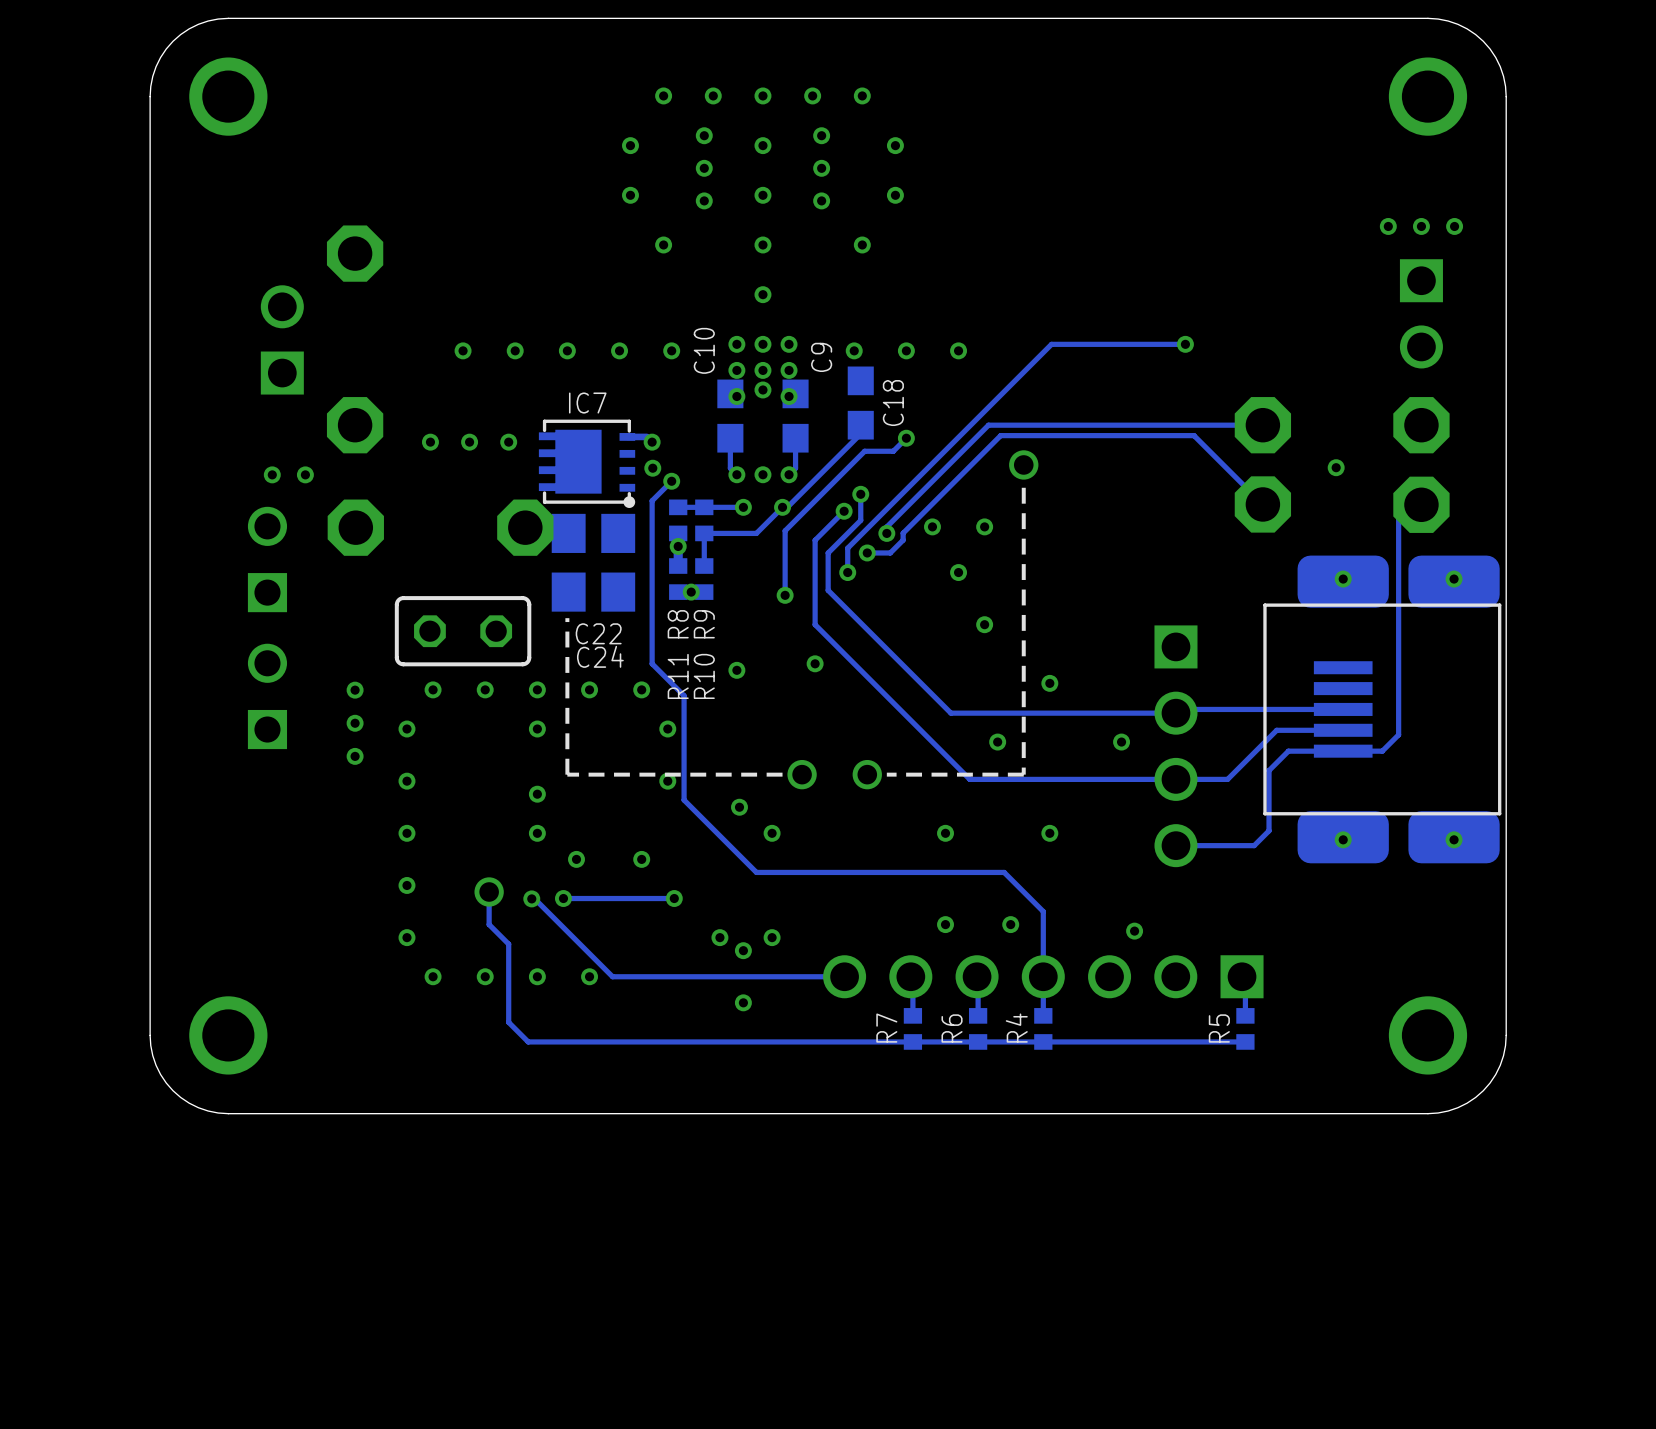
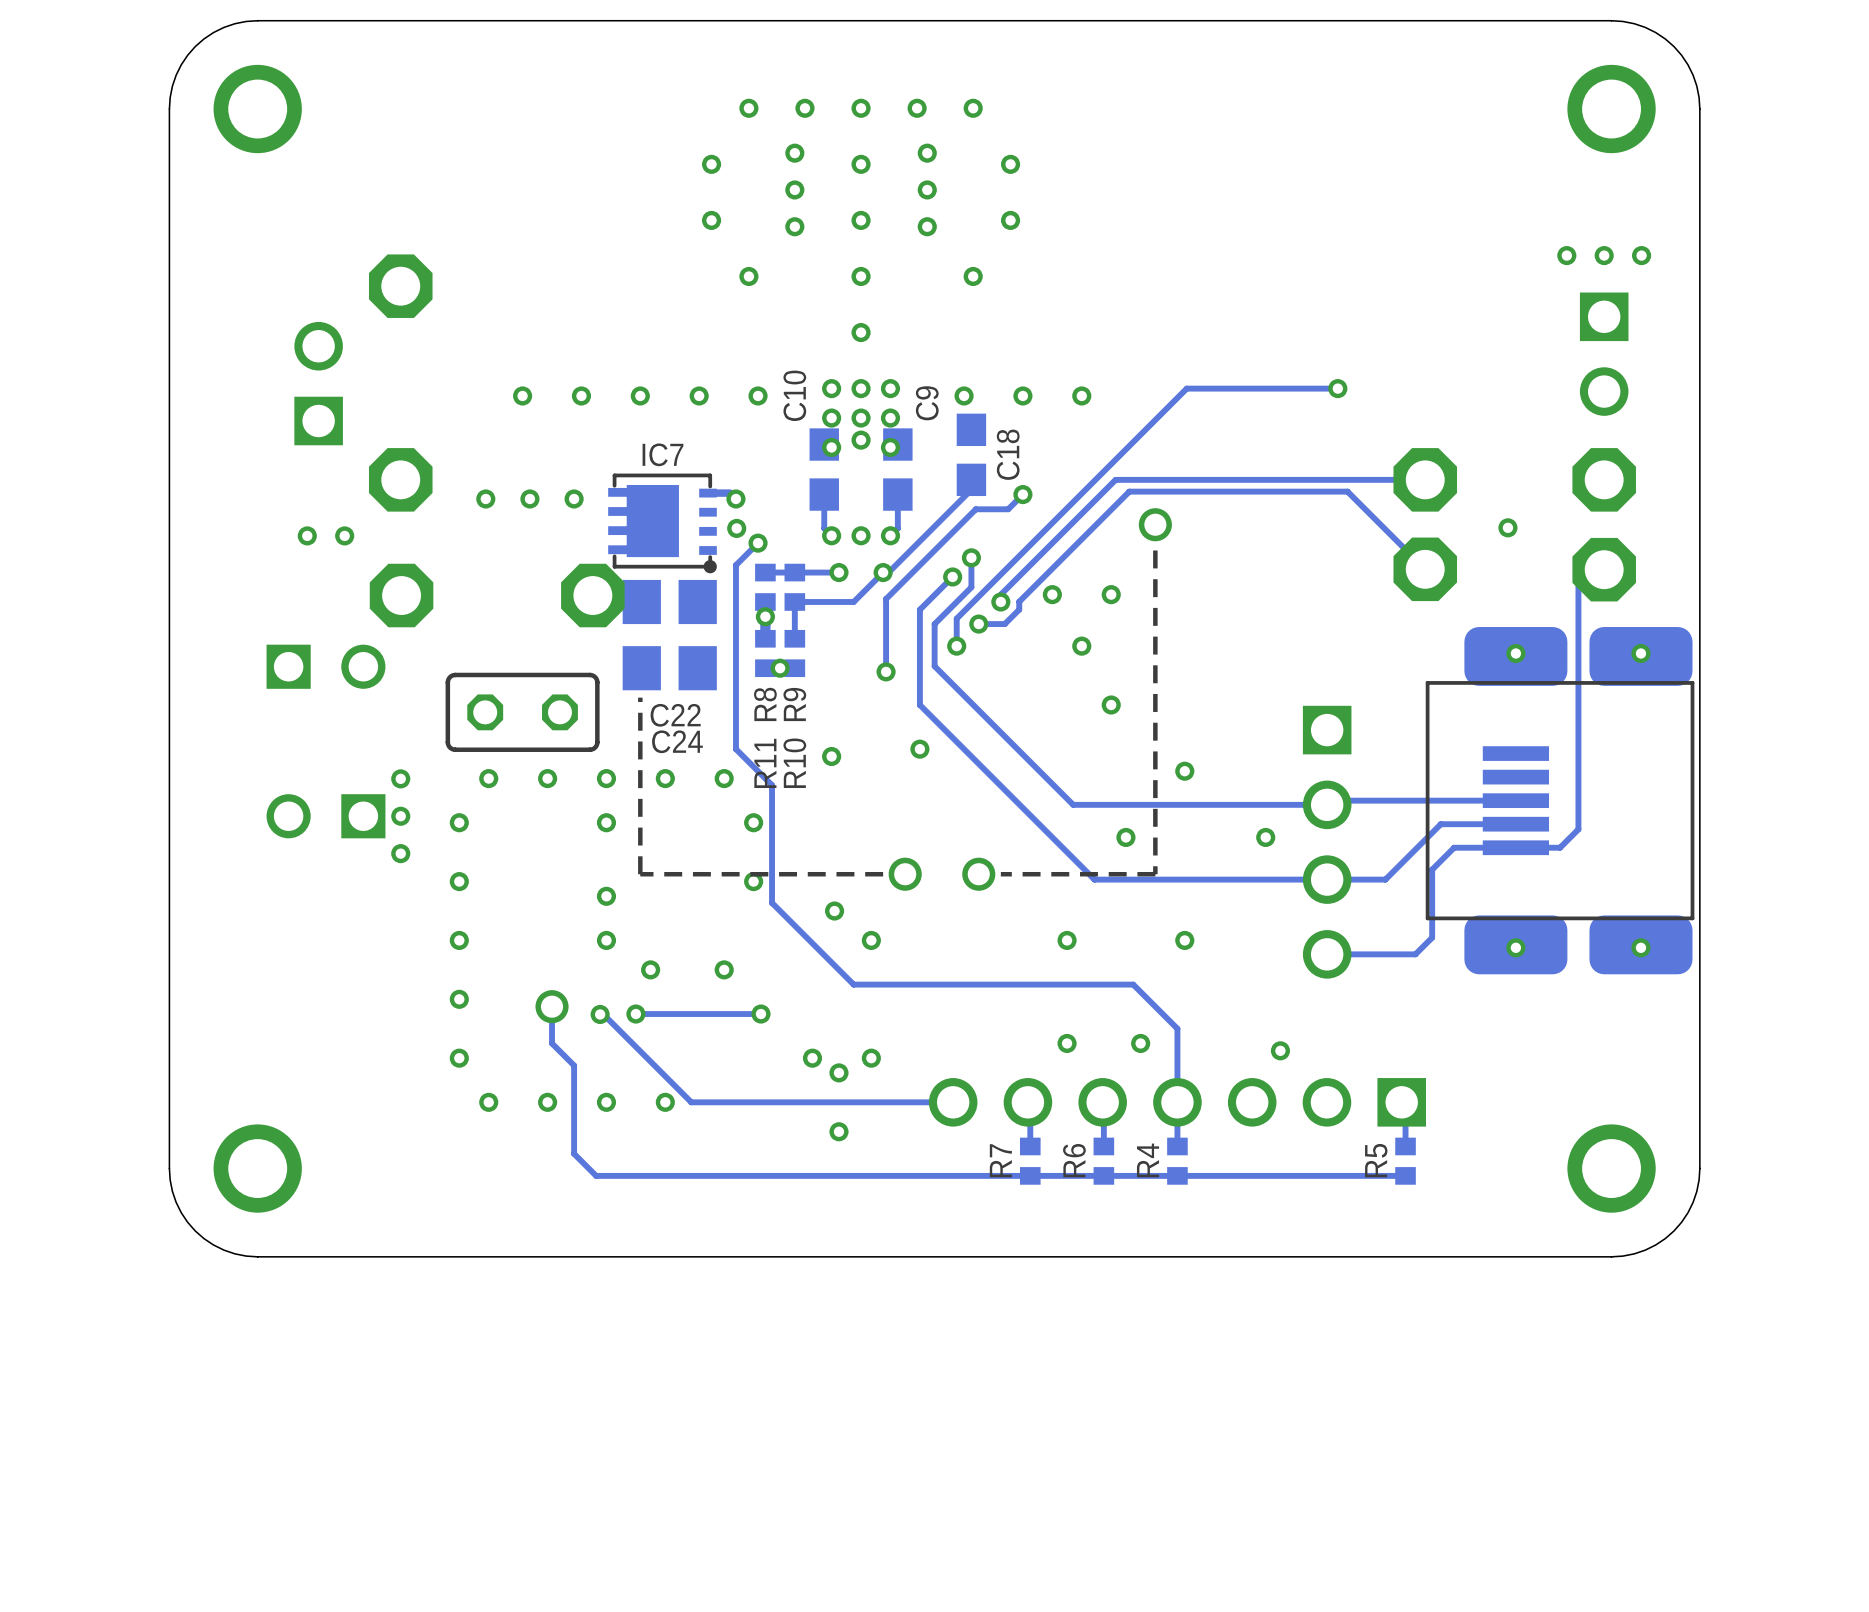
part rotation: 0° (267, 559) -> 90° clockwise (325, 666)
part rotation: 0° (267, 696) -> 90° counterclockwise (325, 816)

